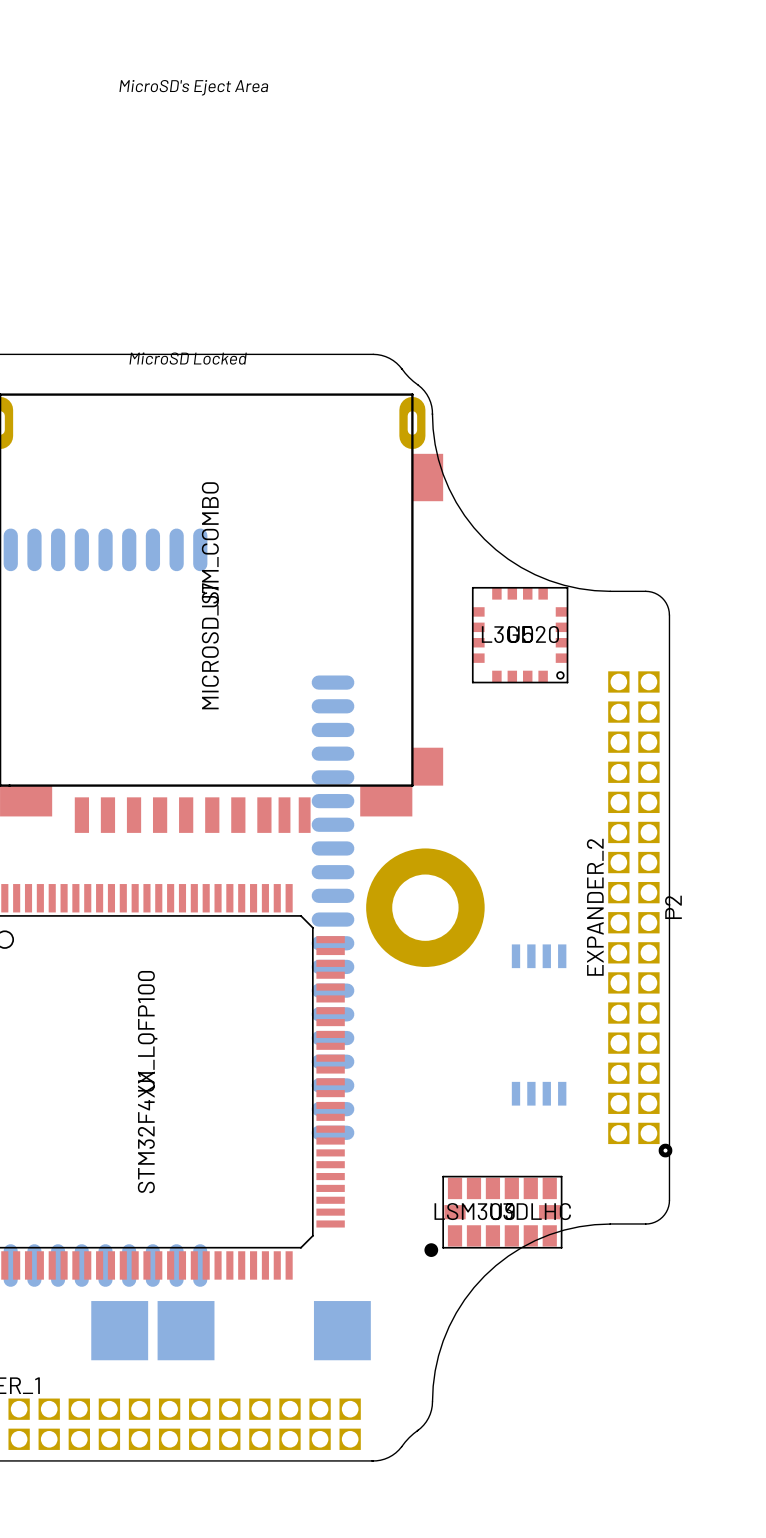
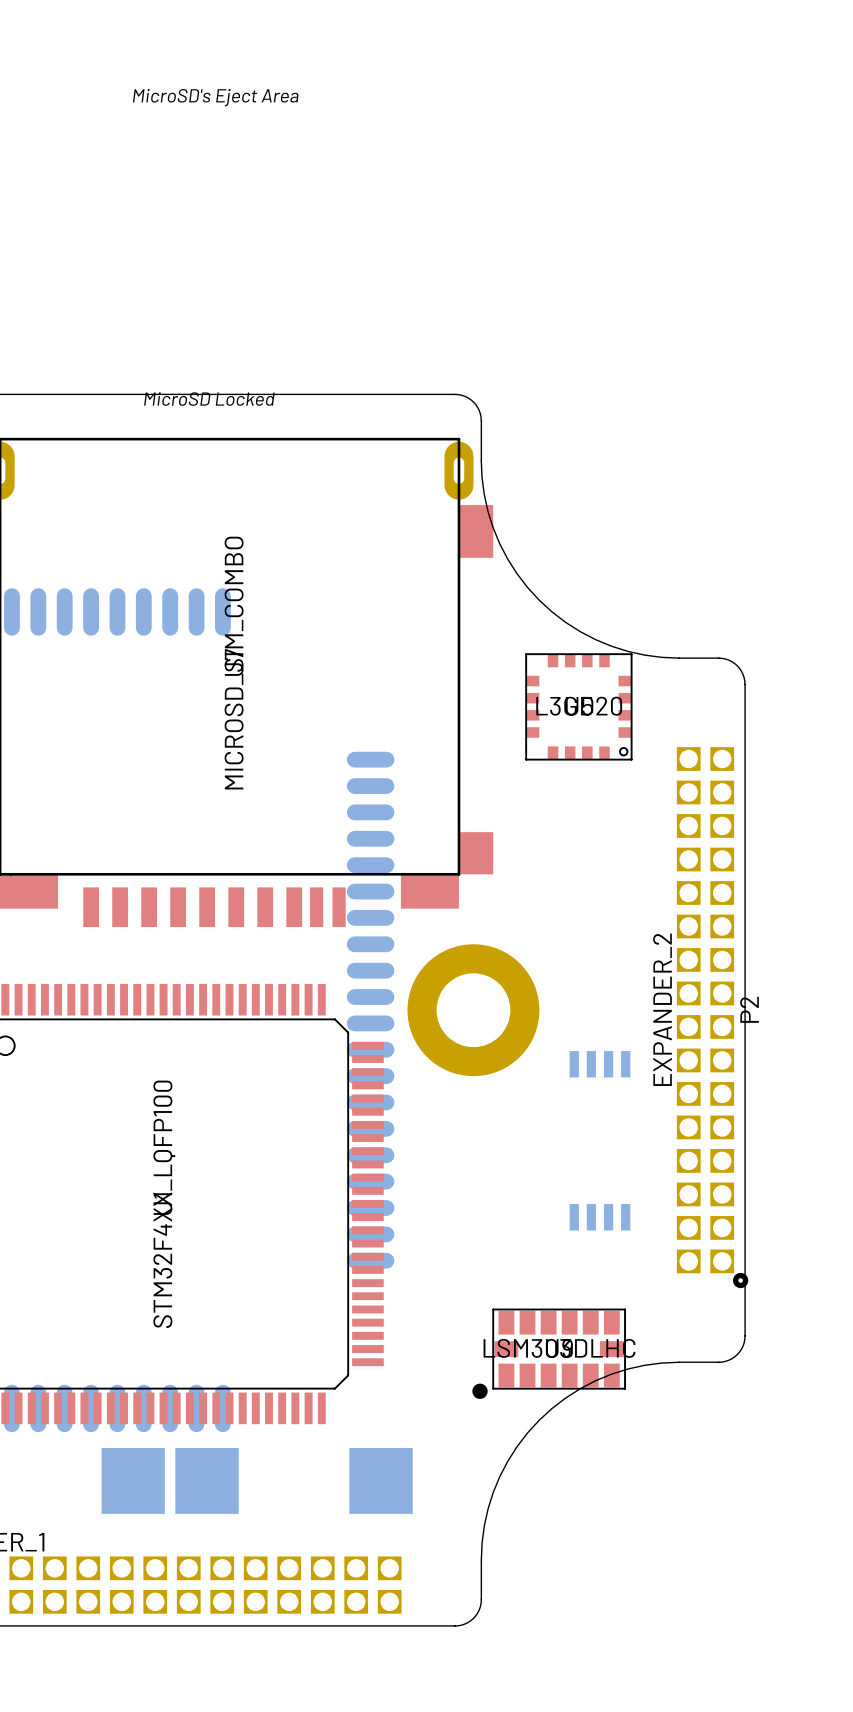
board edge: (373, 354) (389, 358) (402, 369) -> (415, 394) (458, 394) (473, 402) (481, 417) (481, 460)
board edge: (401, 368) (426, 394) (430, 402) (432, 414) -> none
board edge: (432, 1401) (428, 1418) (417, 1430) -> (481, 1560) (481, 1603) (473, 1618) (458, 1625) (415, 1625)
board edge: (418, 1430) (392, 1455) (384, 1459) (372, 1460) -> none

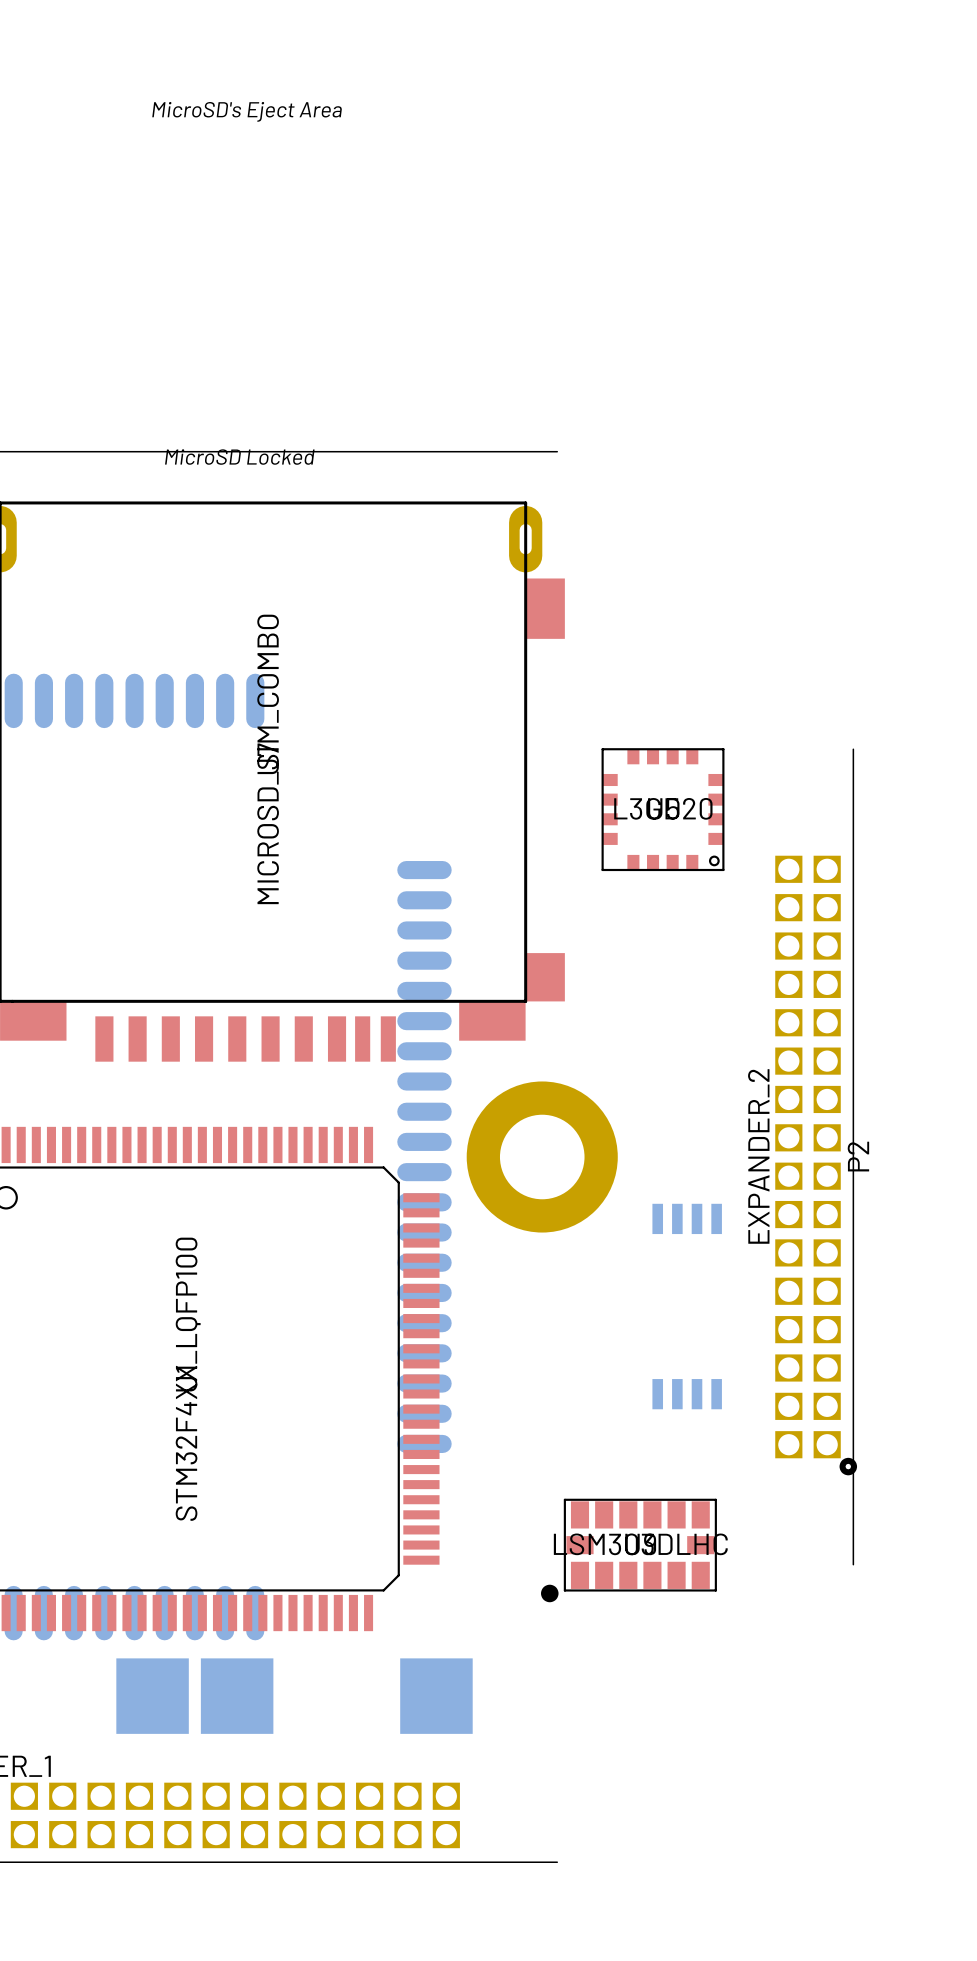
board edge: (454, 394) (468, 397) (479, 410) (481, 420) (482, 477) (488, 511) (493, 527) (507, 559) (527, 587) (539, 600) (551, 611) (580, 631) (611, 646) (627, 651) (661, 657) (718, 658) (728, 660) (741, 671) (745, 684) -> (521, 451) (557, 451)
board edge: none -> (853, 749) (853, 783)
board edge: (745, 1335) (739, 1351) (728, 1360) (718, 1362) (661, 1363) (644, 1365) (611, 1374) (595, 1380) (565, 1398) (539, 1420) (517, 1446) (499, 1476) (493, 1492) (484, 1525) (482, 1542) (481, 1599) (479, 1609) (471, 1620) (454, 1626) -> (557, 1862) (521, 1862)
board edge: none -> (853, 1530) (853, 1564)

